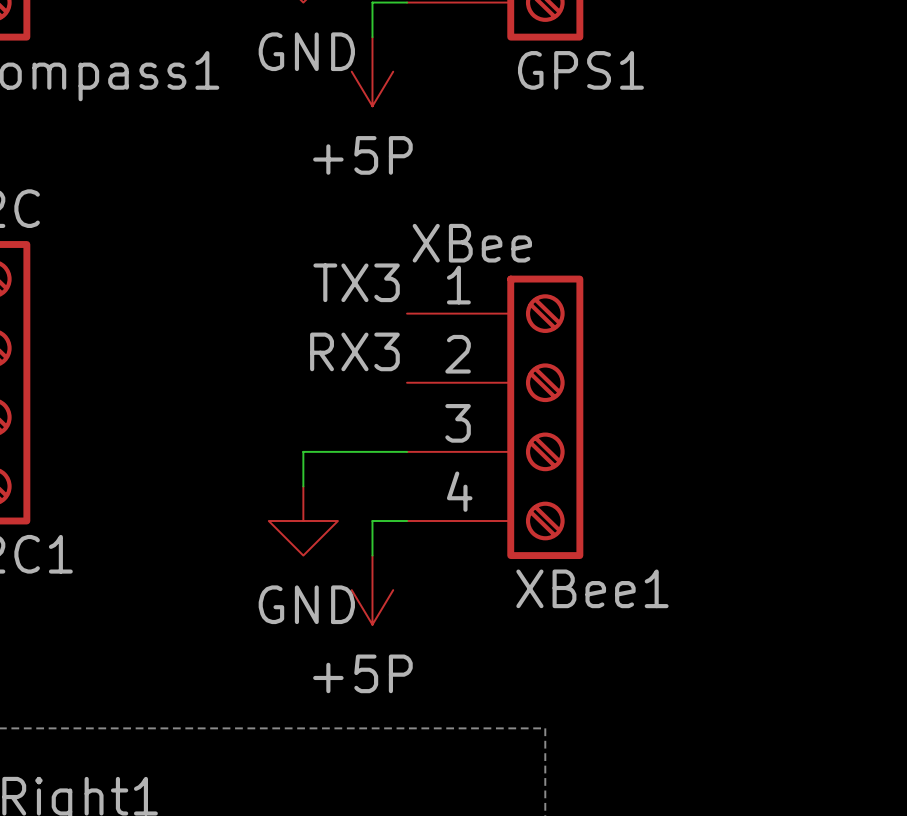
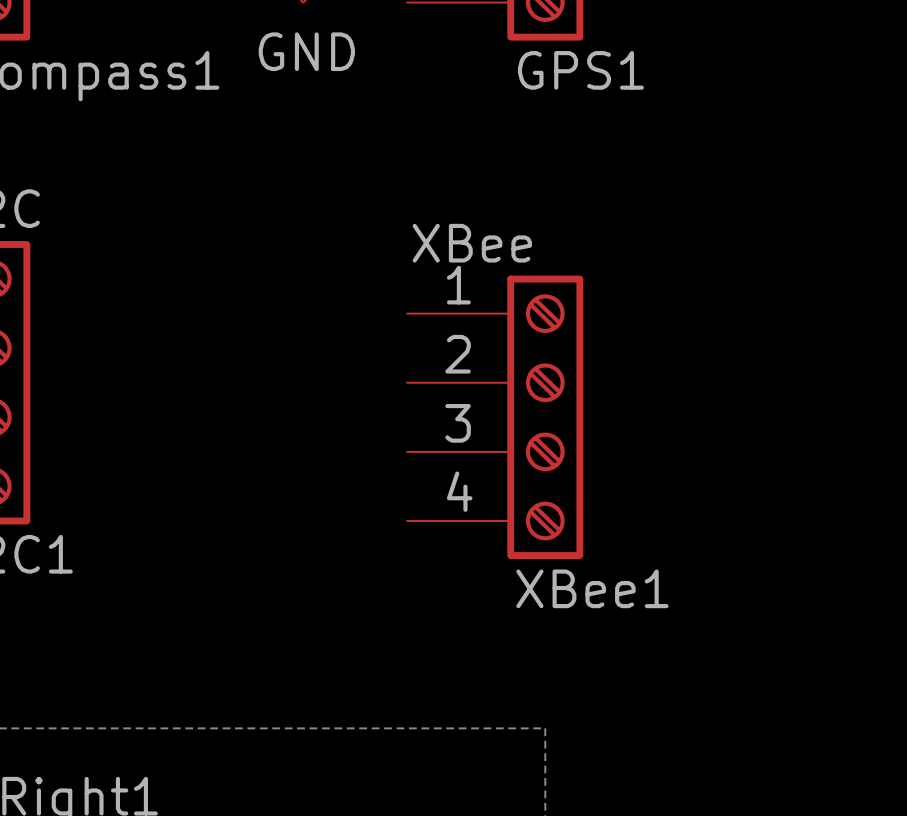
wire: (407, 2) (372, 2) (372, 37) -> none
power symbol: +5P (372, 71) -> none
label: TX3 (356, 282) -> none
label: RX3 (354, 351) -> none
wire: (407, 451) (303, 451) (303, 486) -> none
power symbol: GND (303, 521) -> none
wire: (407, 521) (372, 521) (372, 555) -> none
power symbol: +5P (372, 590) -> none

